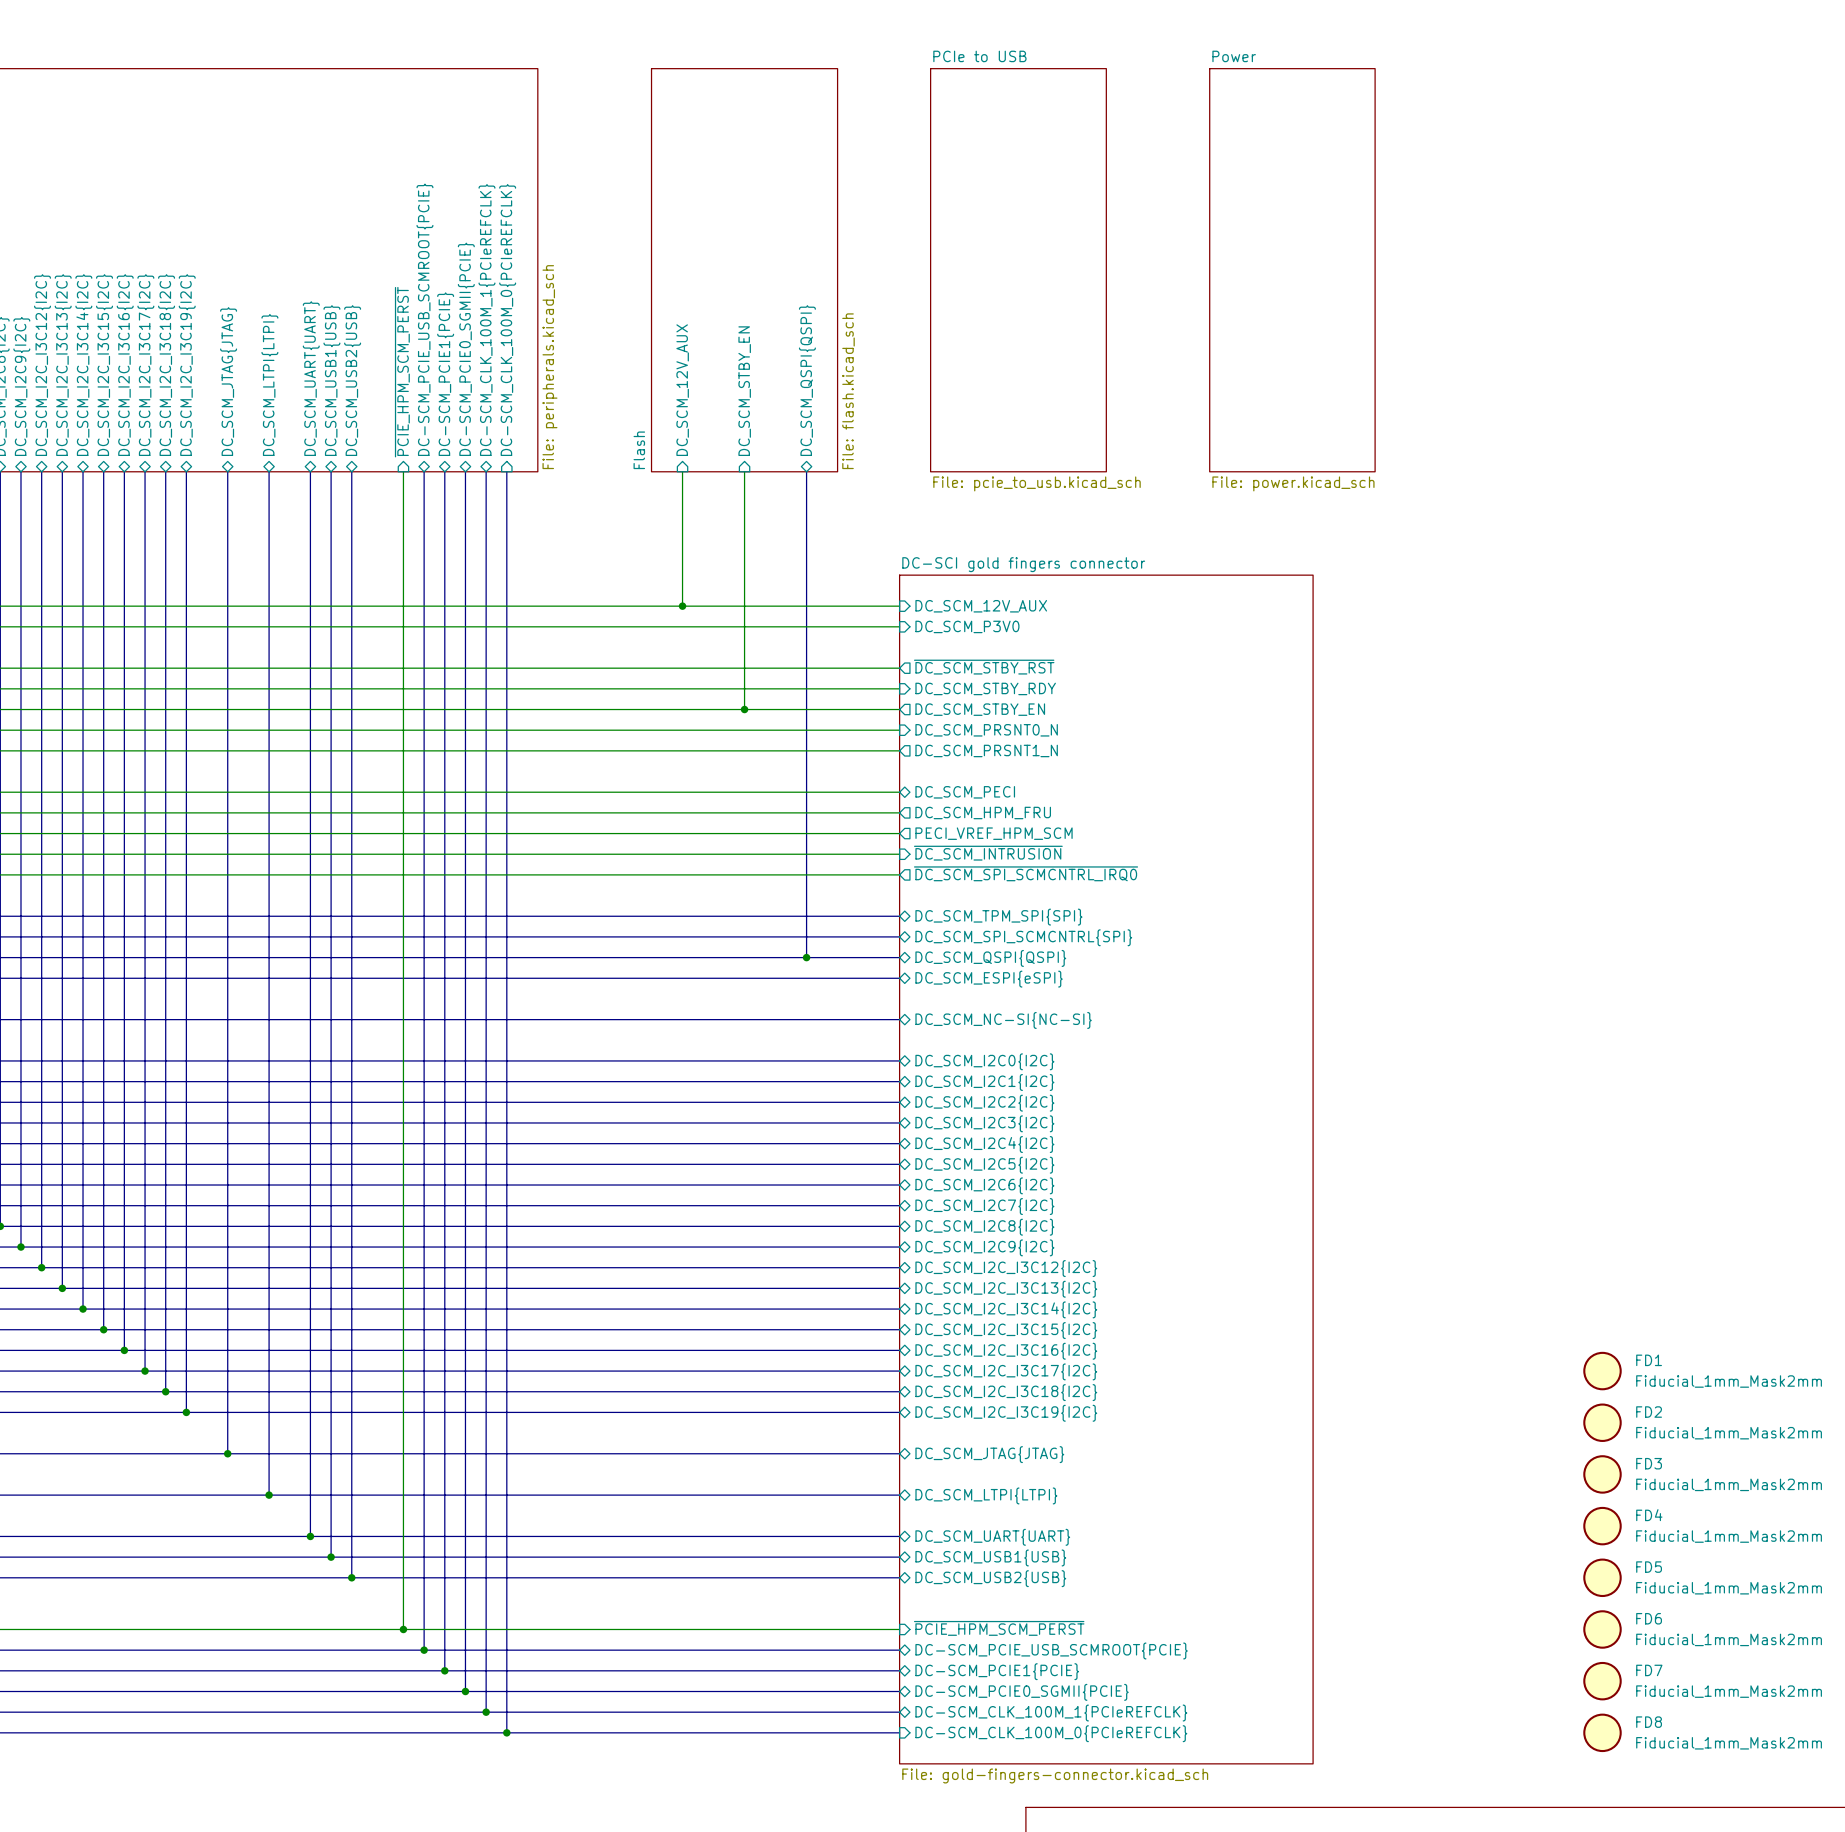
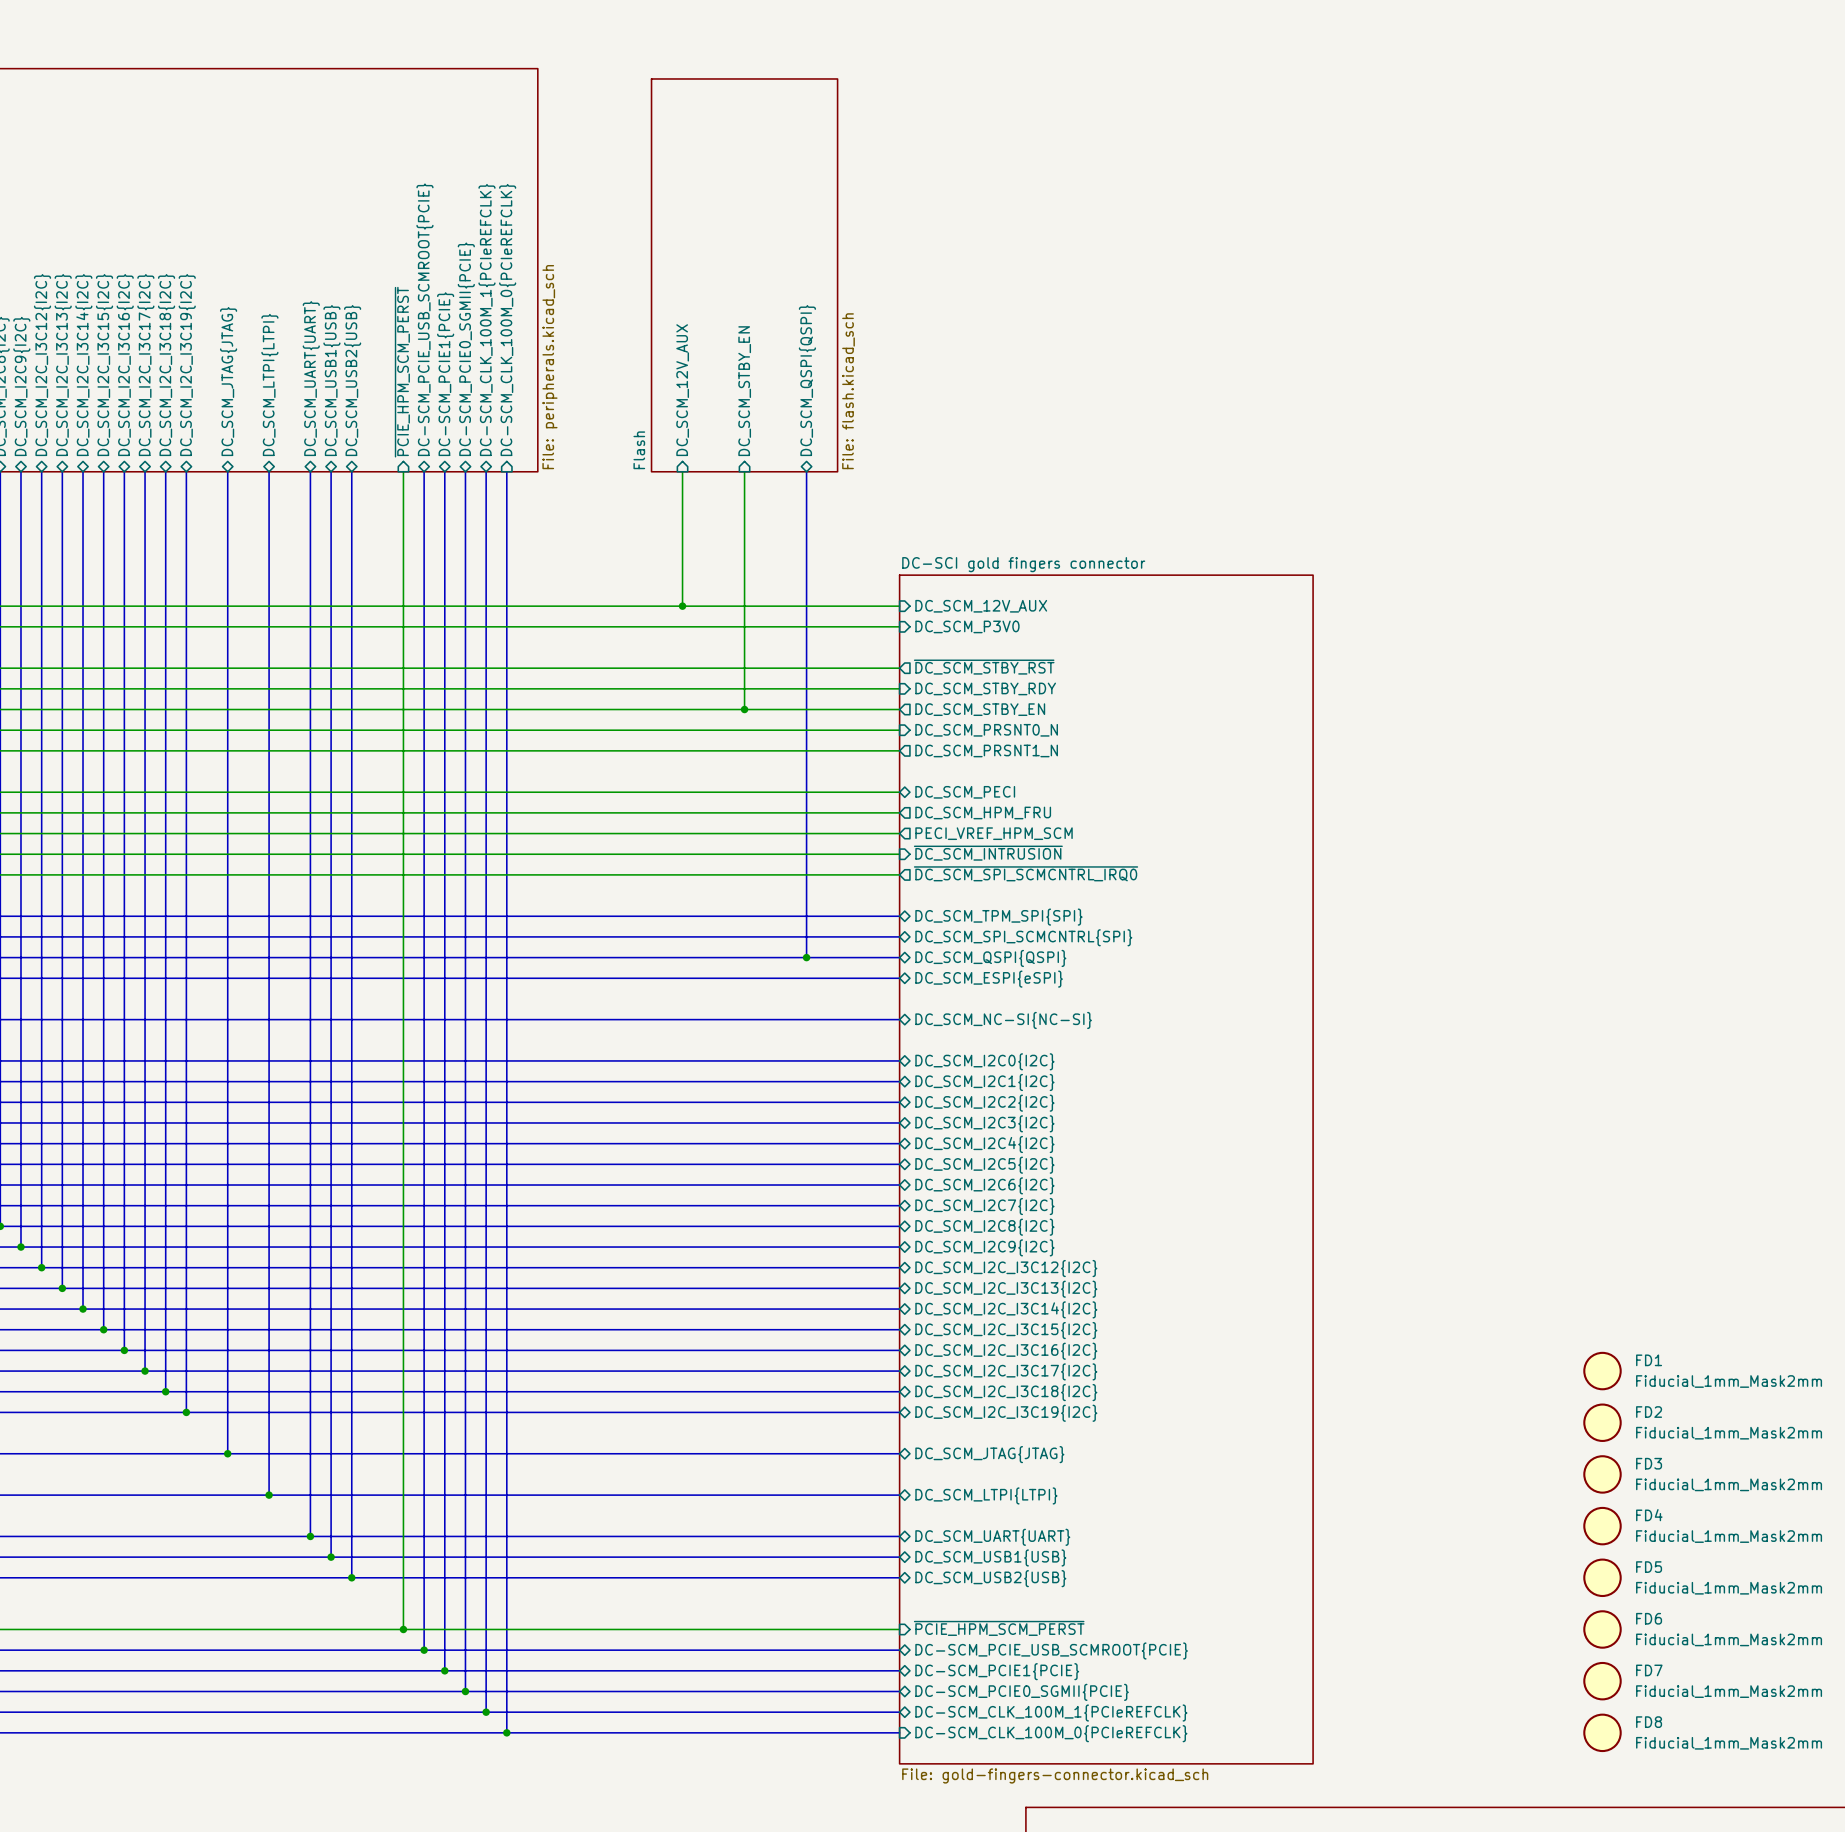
sheet Flash shape: [650, 68, 839, 473] -> [650, 78, 839, 473]
sheet PCIe to USB: File: pcie_to_usb.kicad_sch (1018, 270) -> none
sheet Power: File: power.kicad_sch (1292, 270) -> none

